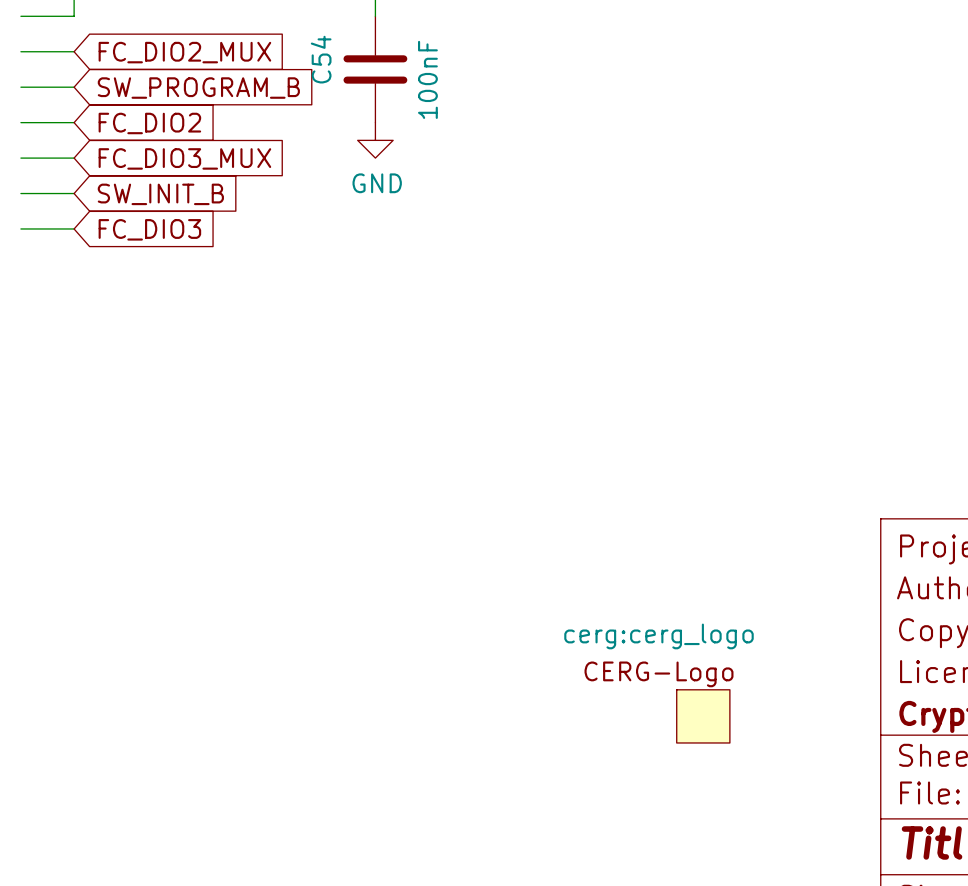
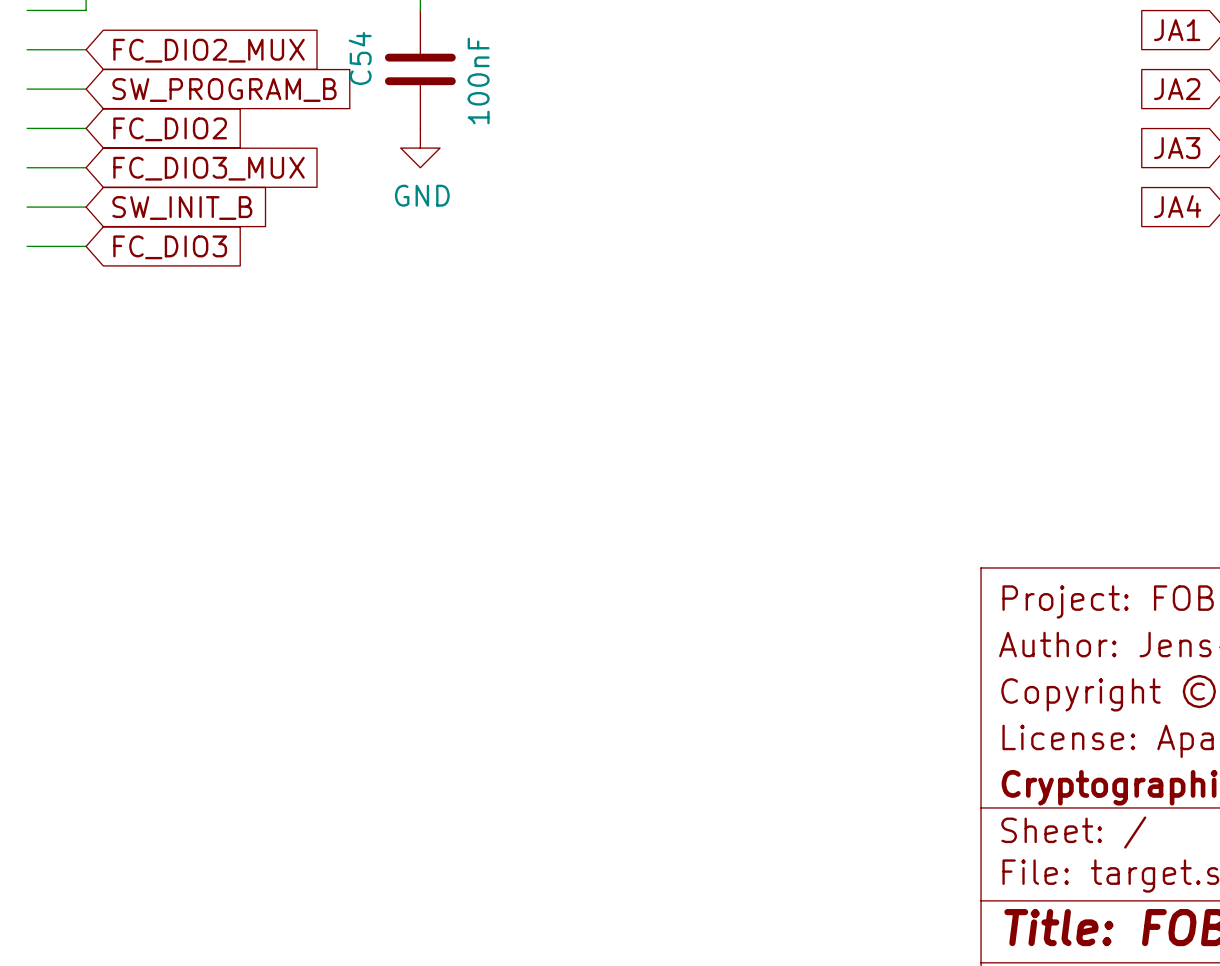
power symbol: (703, 716) -> none

